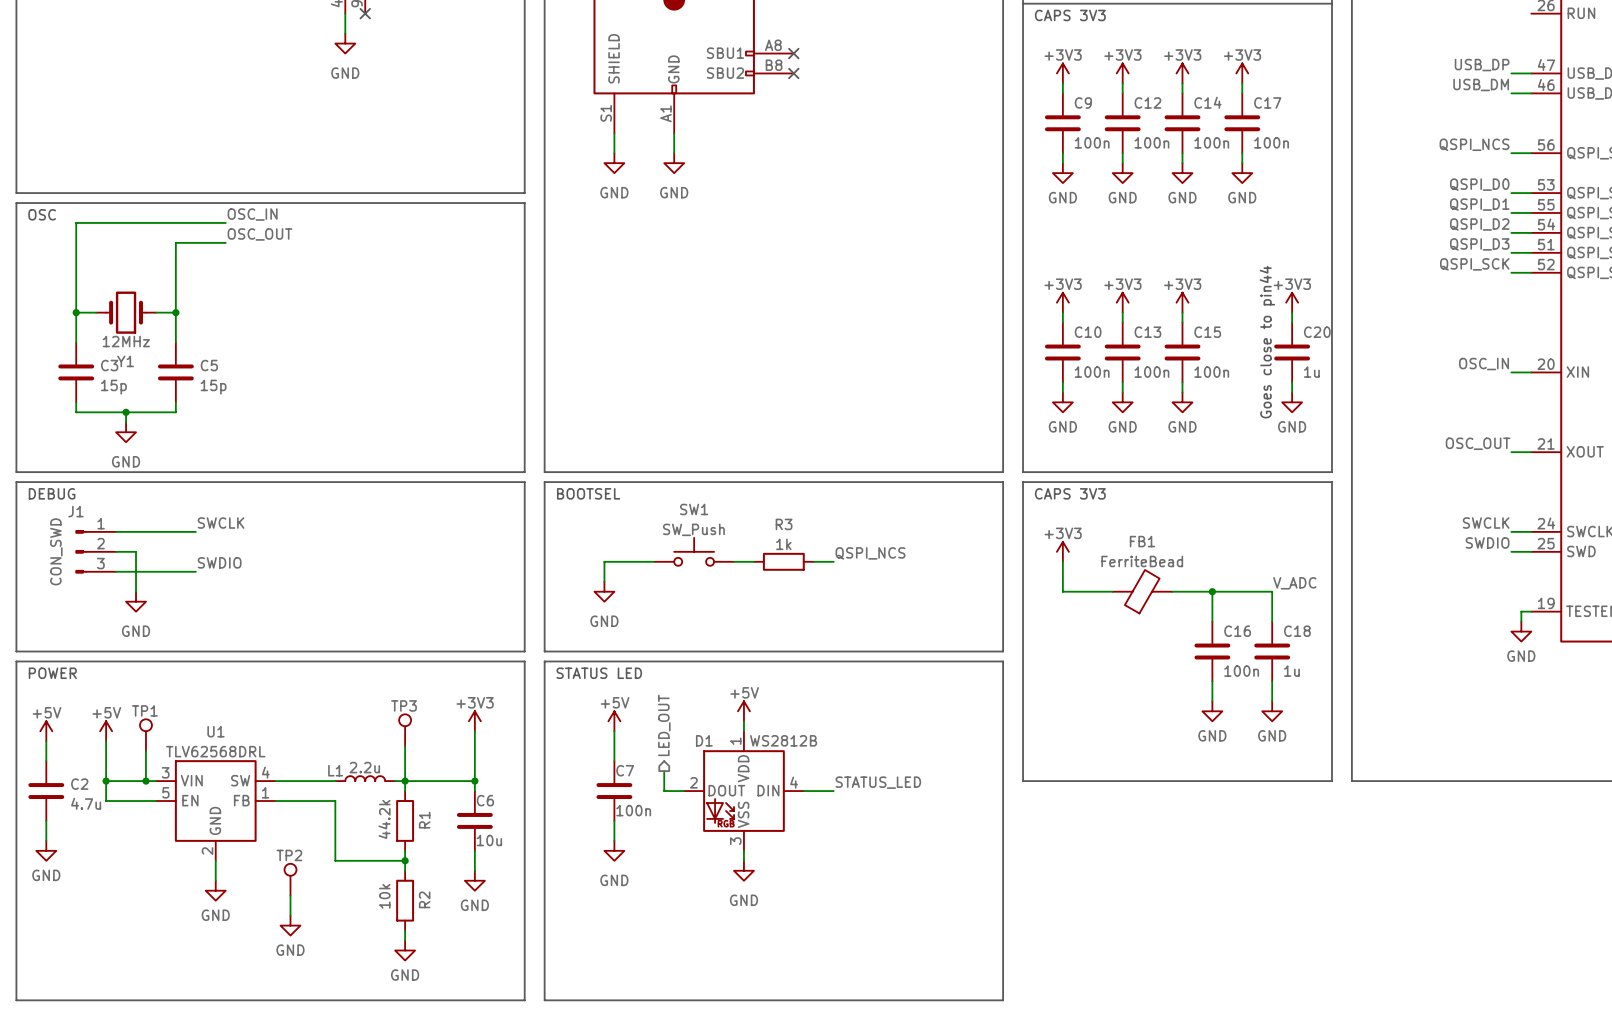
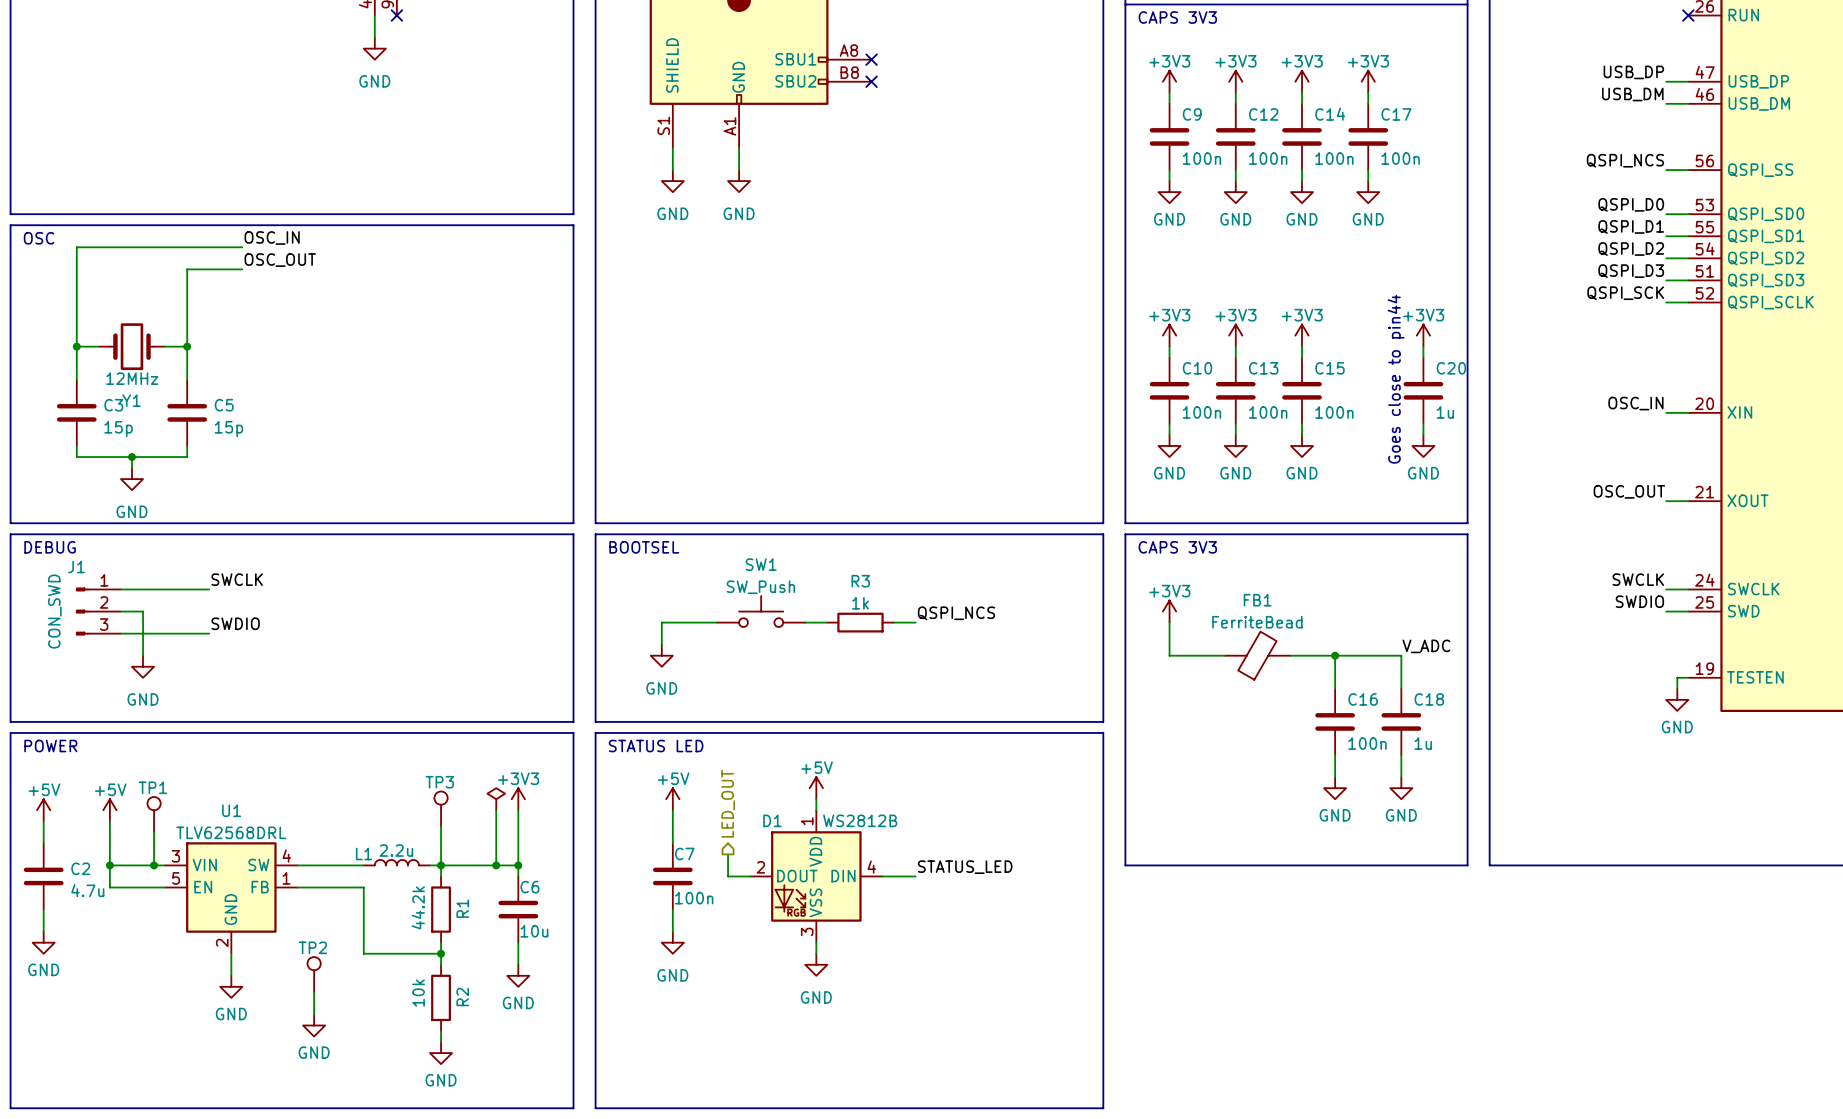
no-connect mark: none -> (1688, 15)
power symbol: none -> (496, 799)
wire: none -> (496, 810) (496, 865)
junction: none -> (496, 865)

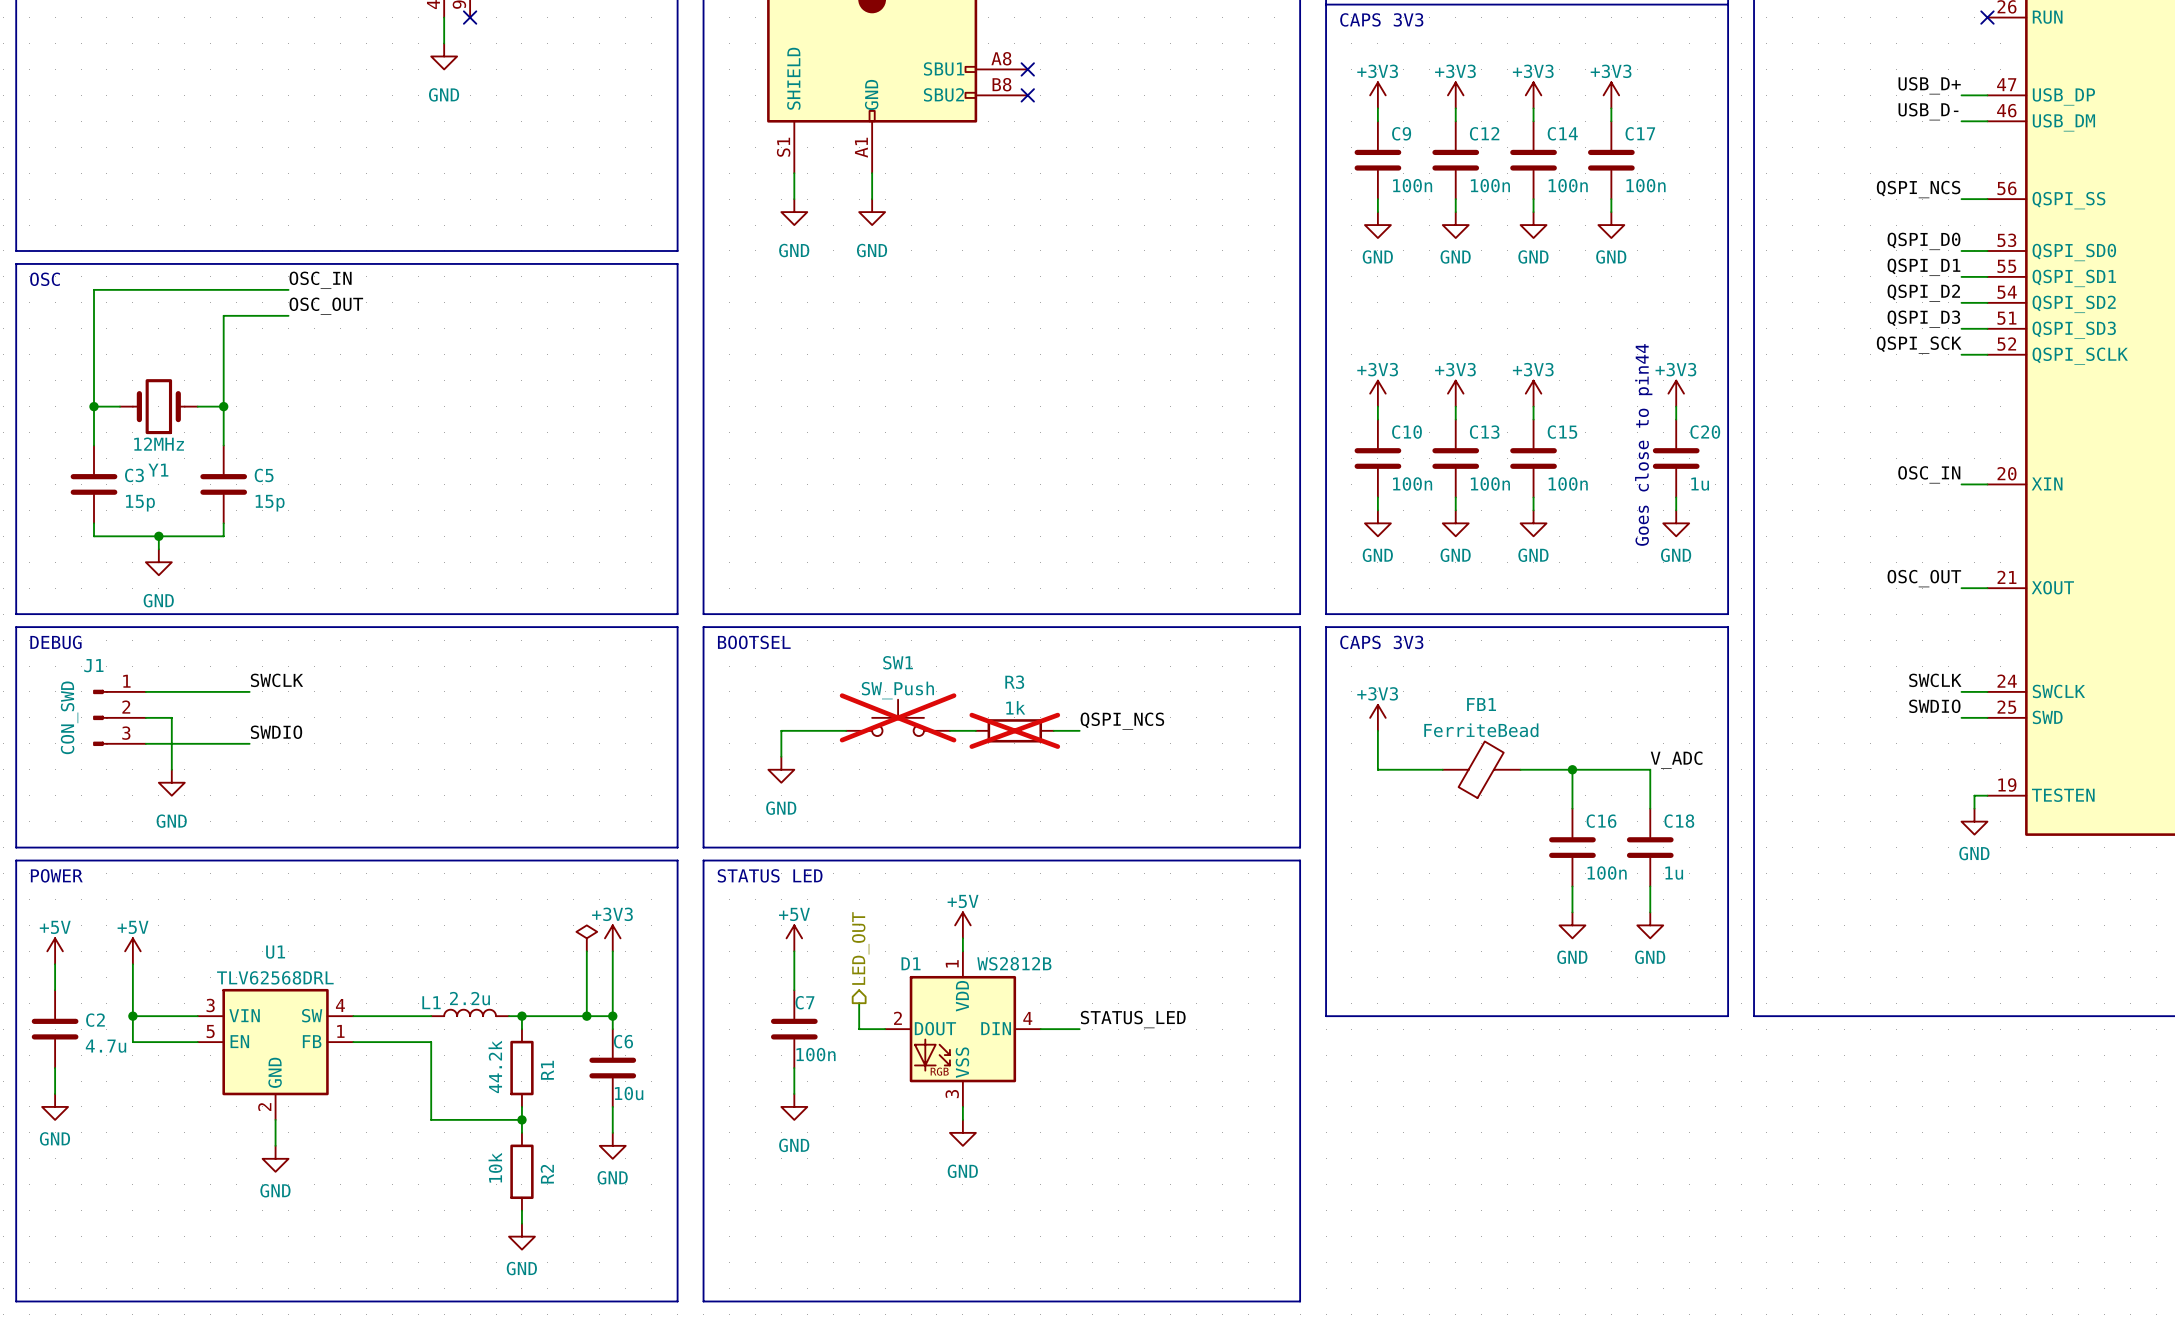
label: USB_DP (1633, 72) -> USB_D+ (1929, 85)
label: USB_DM (1632, 94) -> USB_D- (1928, 111)
SW1 do-not-place cross: none -> (898, 717)
R3 do-not-place cross: none -> (1014, 730)
TP3: (441, 809) -> none
TP1: (154, 814) -> none
wire: (441, 826) (441, 865) -> none
wire: (154, 832) (154, 865) -> none
junction: (154, 865) -> none
TP2: (314, 974) -> none
wire: (314, 992) (314, 1014) -> none
power symbol: GND (314, 1025) -> none

